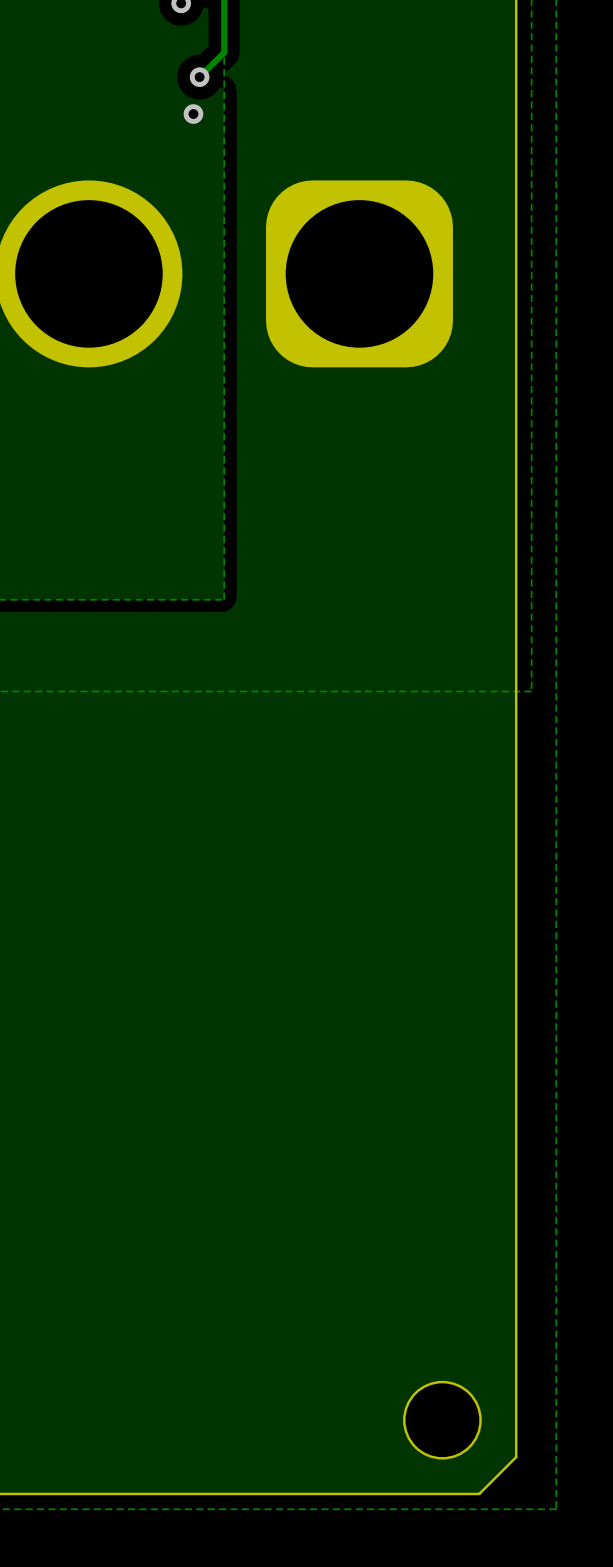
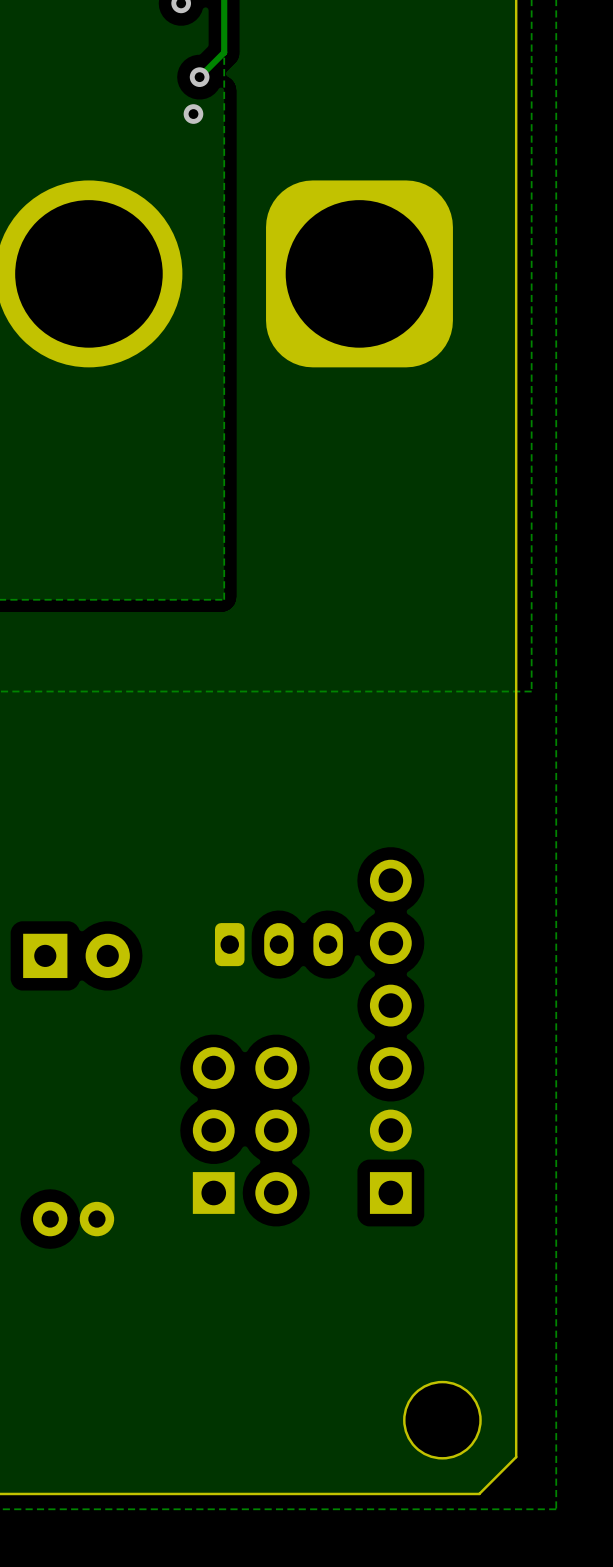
part: none -> (278, 944)
part: none -> (76, 955)
part: none -> (390, 1036)
part: none -> (244, 1130)
part: none -> (73, 1219)

